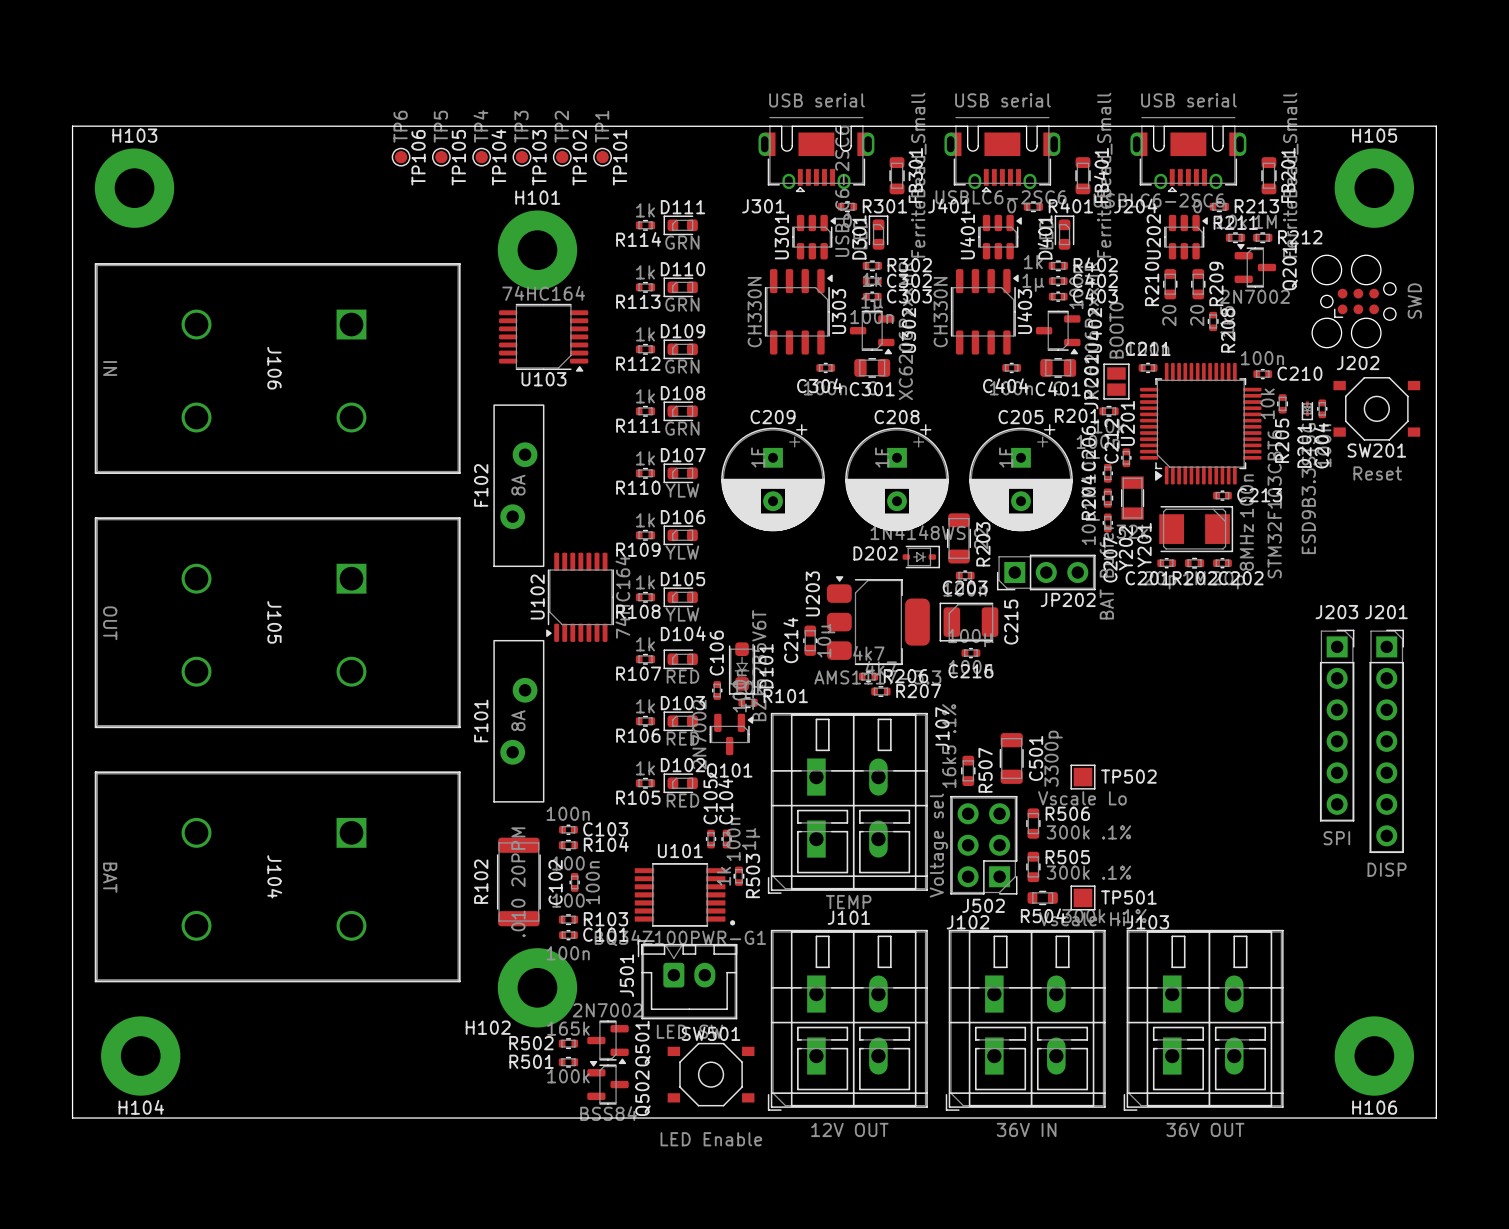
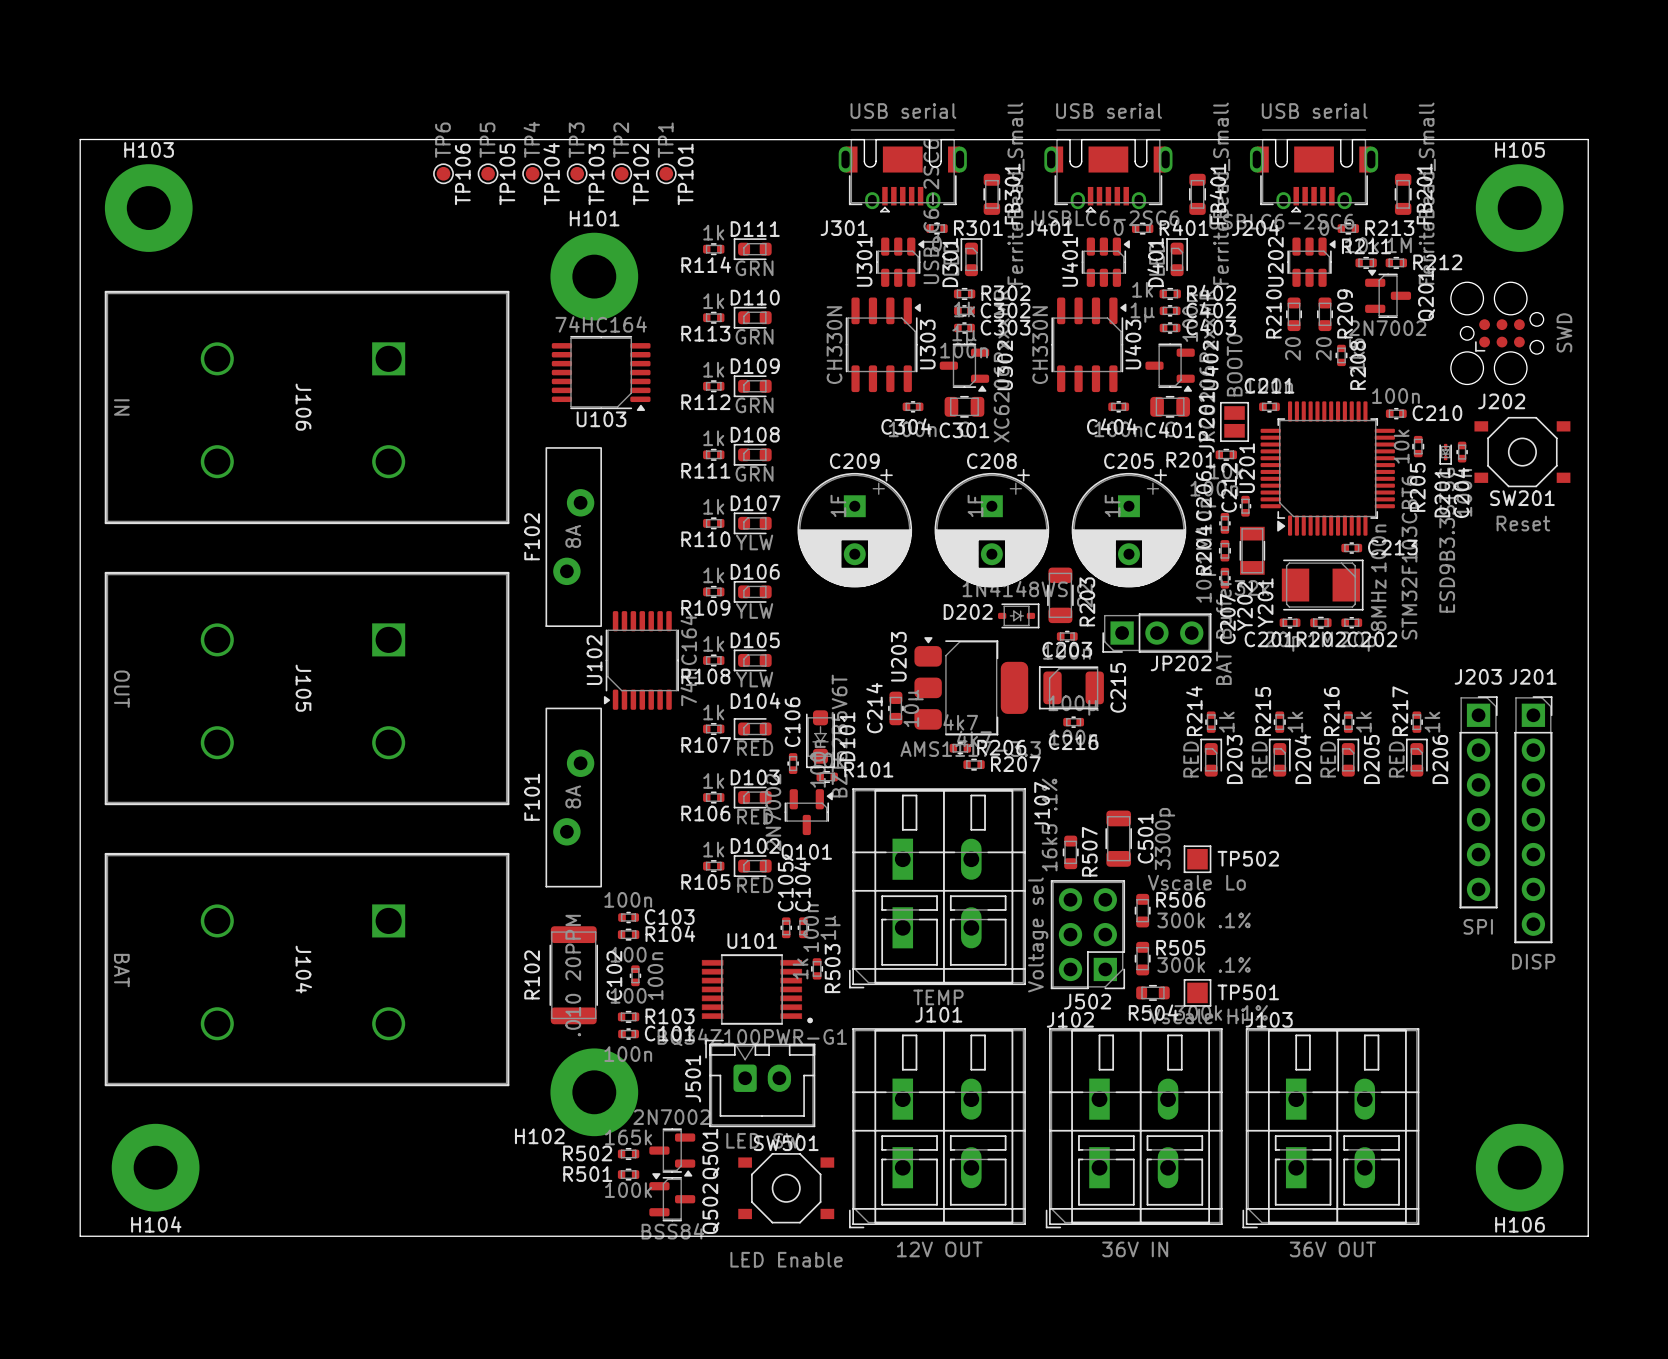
R214: none -> 1k (1211, 722)
R215: none -> 1k (1279, 722)
R216: none -> 1k (1348, 722)
R217: none -> 1k (1416, 722)
D203: none -> RED (1211, 757)
D204: none -> RED (1279, 757)
D205: none -> RED (1348, 757)
D206: none -> RED (1416, 757)

